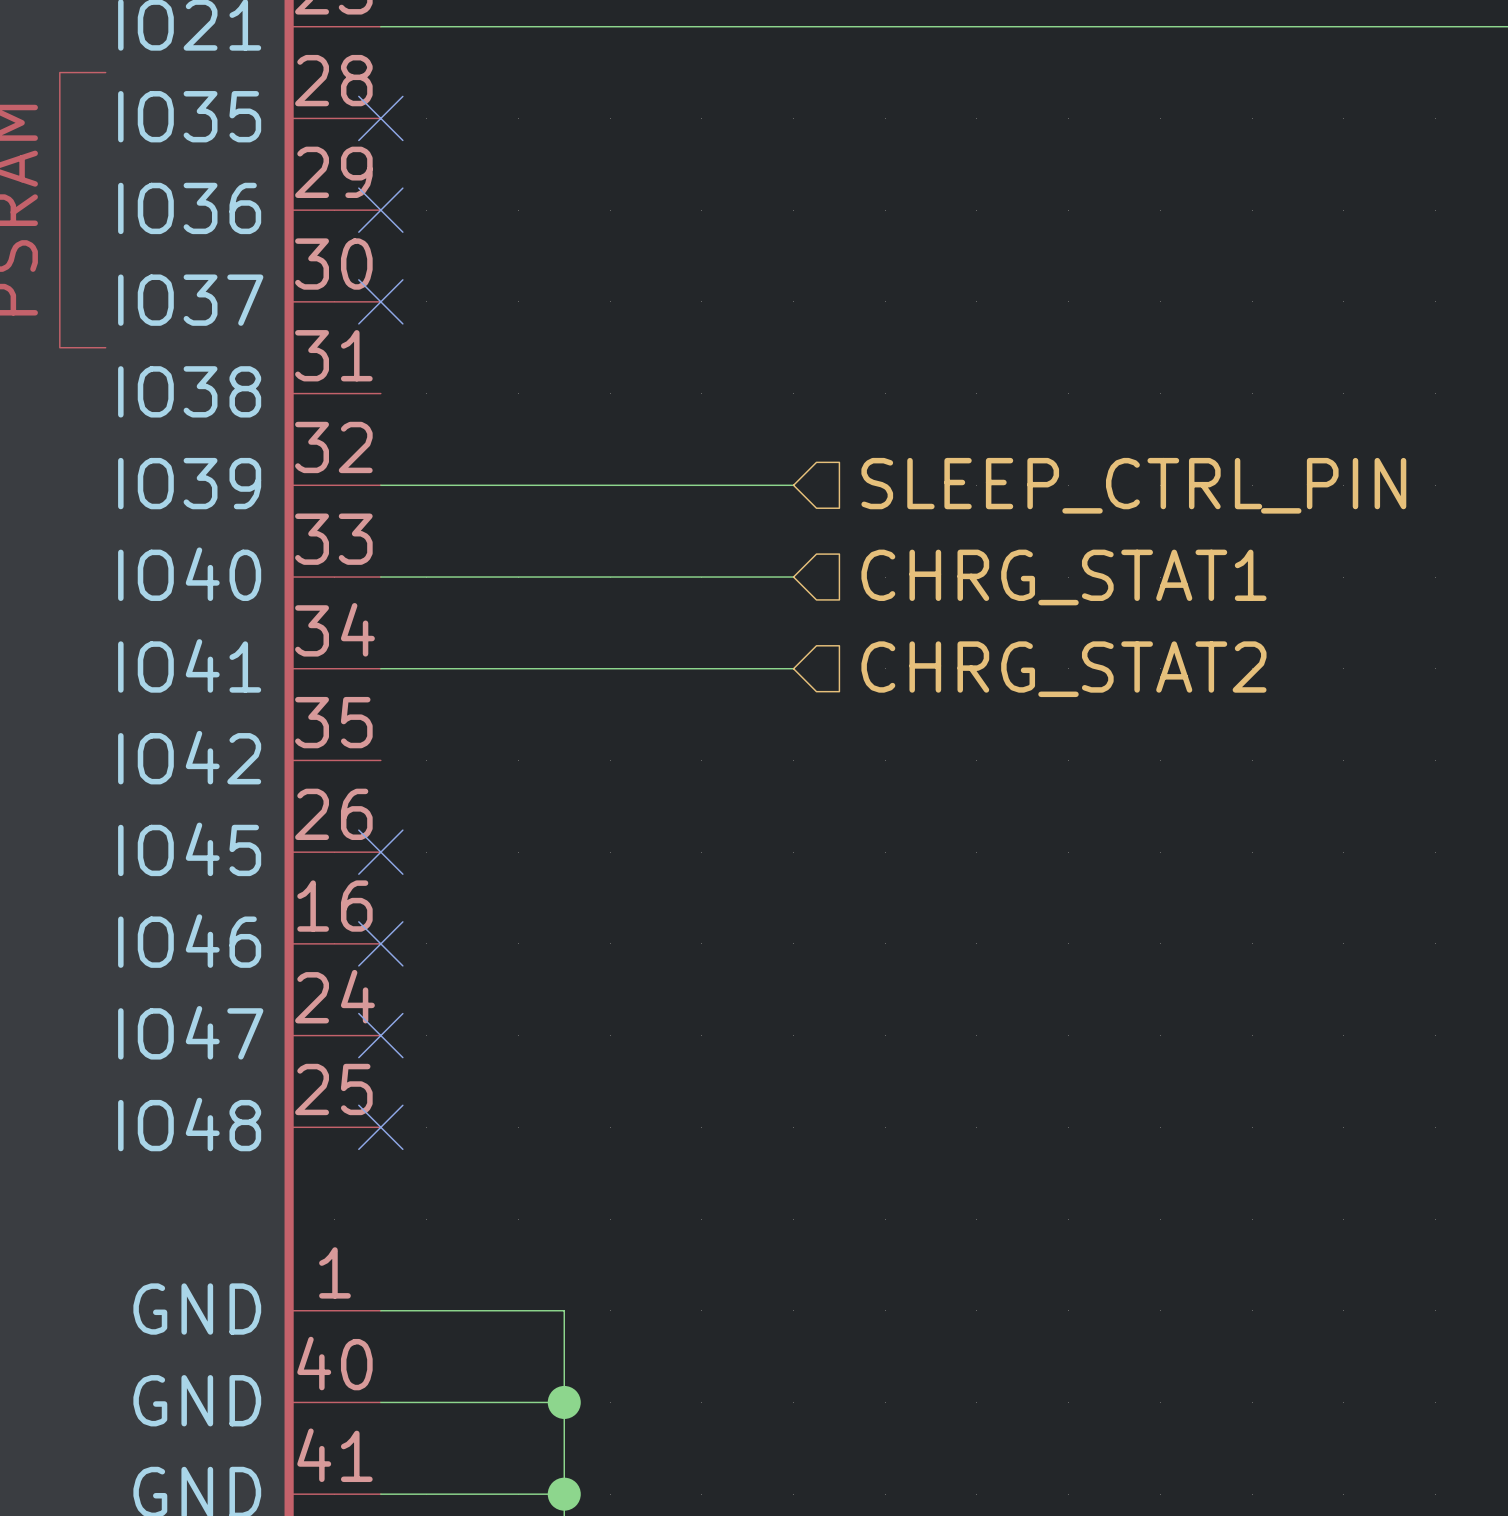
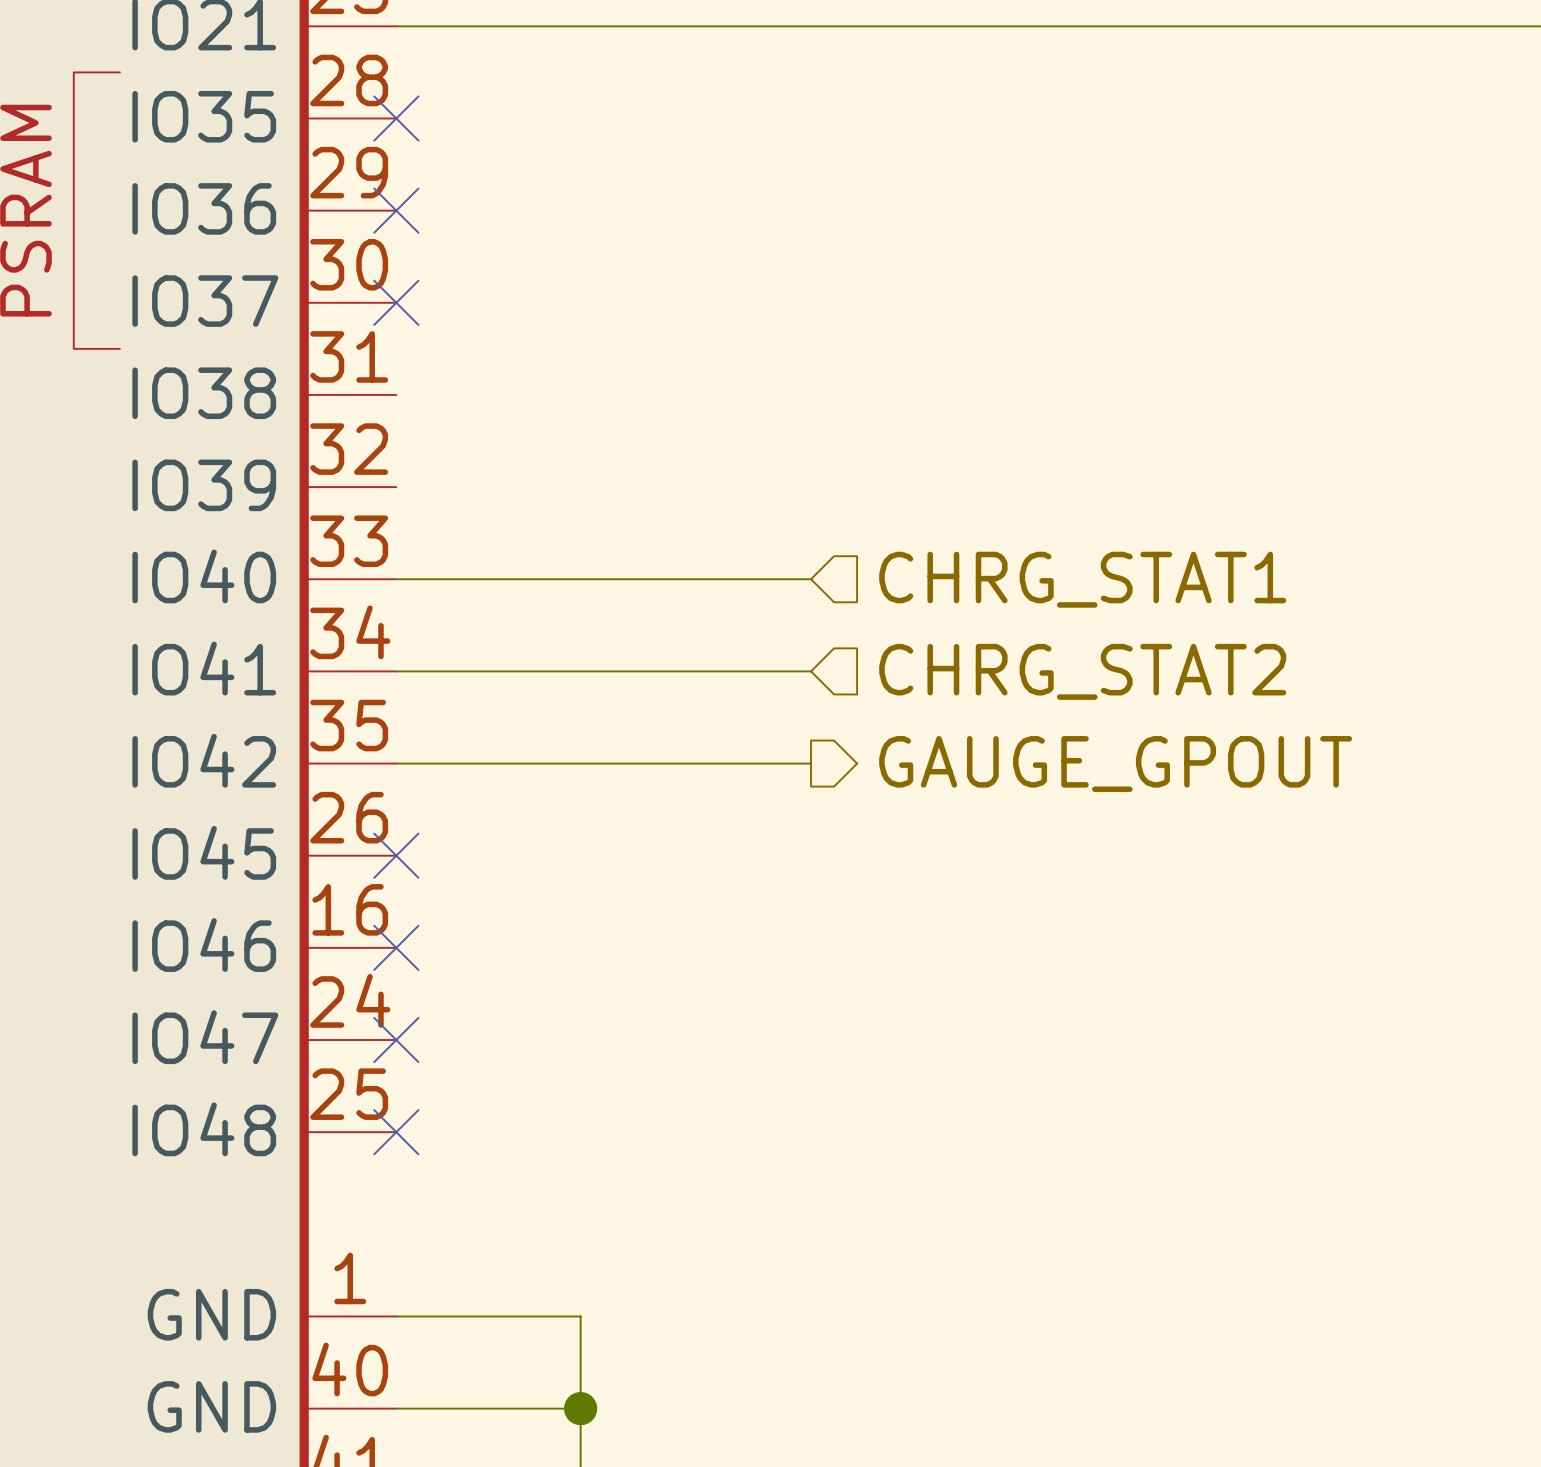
wire: (380, 485) (793, 485) -> (396, 763) (811, 763)
hierarchical label: SLEEP_CTRL_PIN (1133, 485) -> none
hierarchical label: none -> GAUGE_GPOUT (1115, 764)

